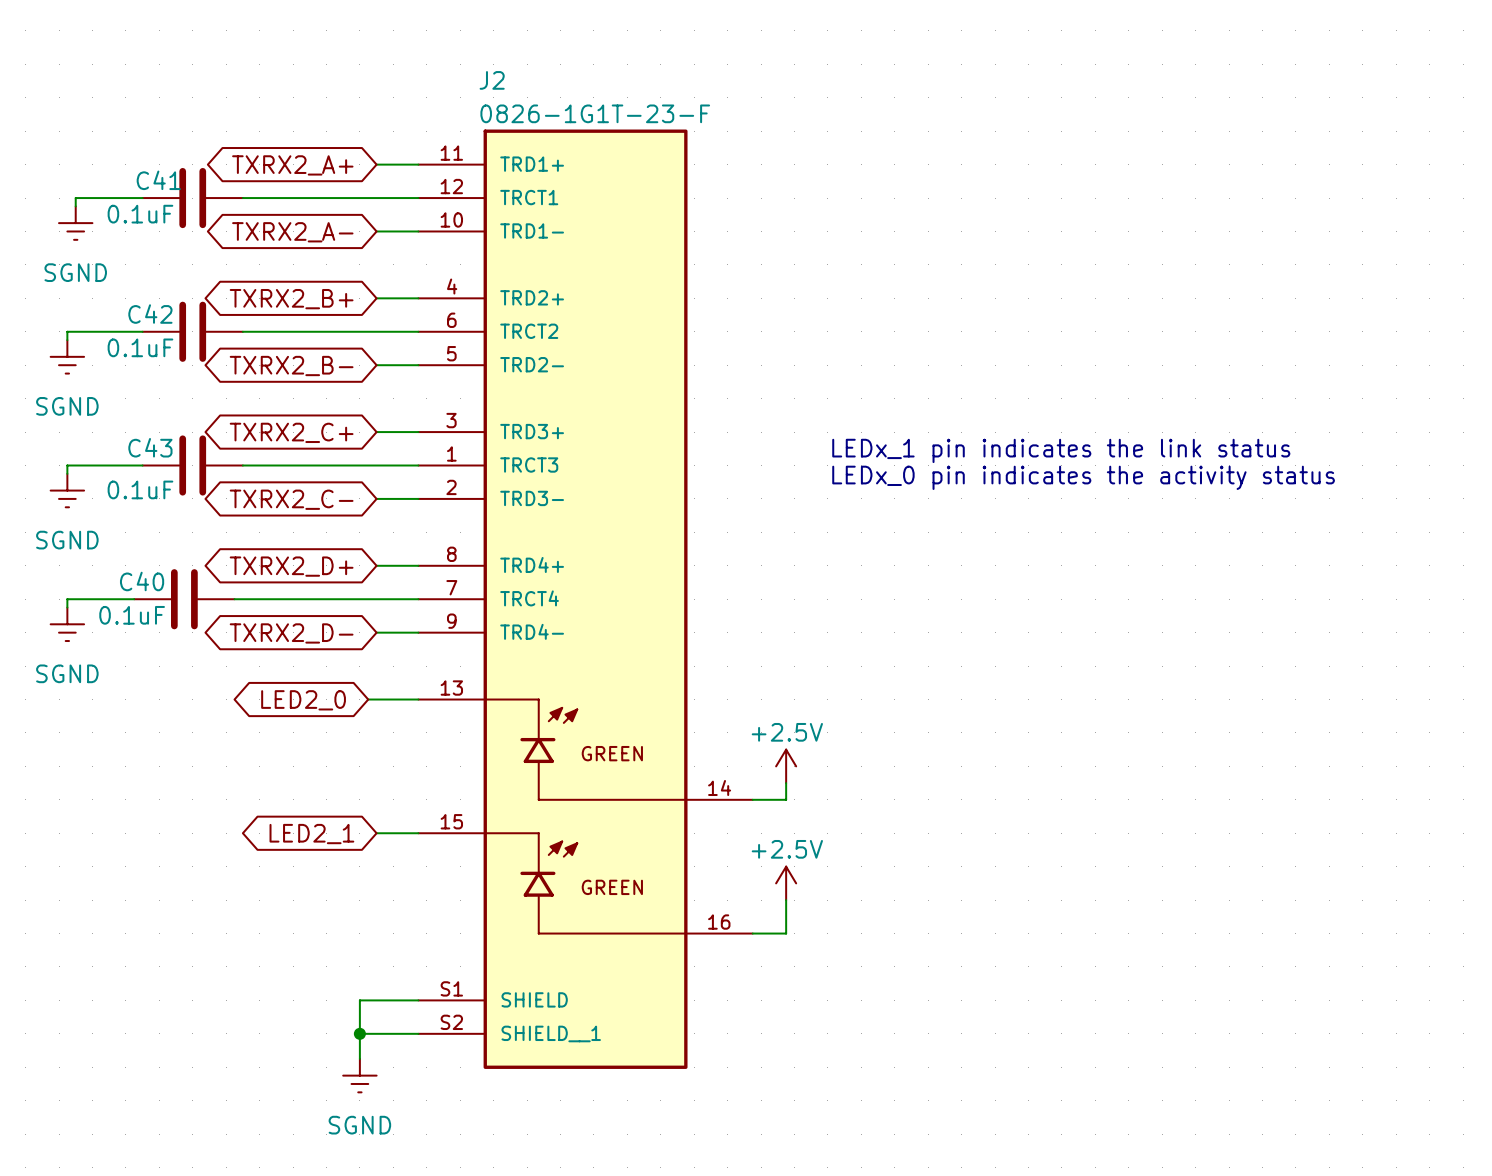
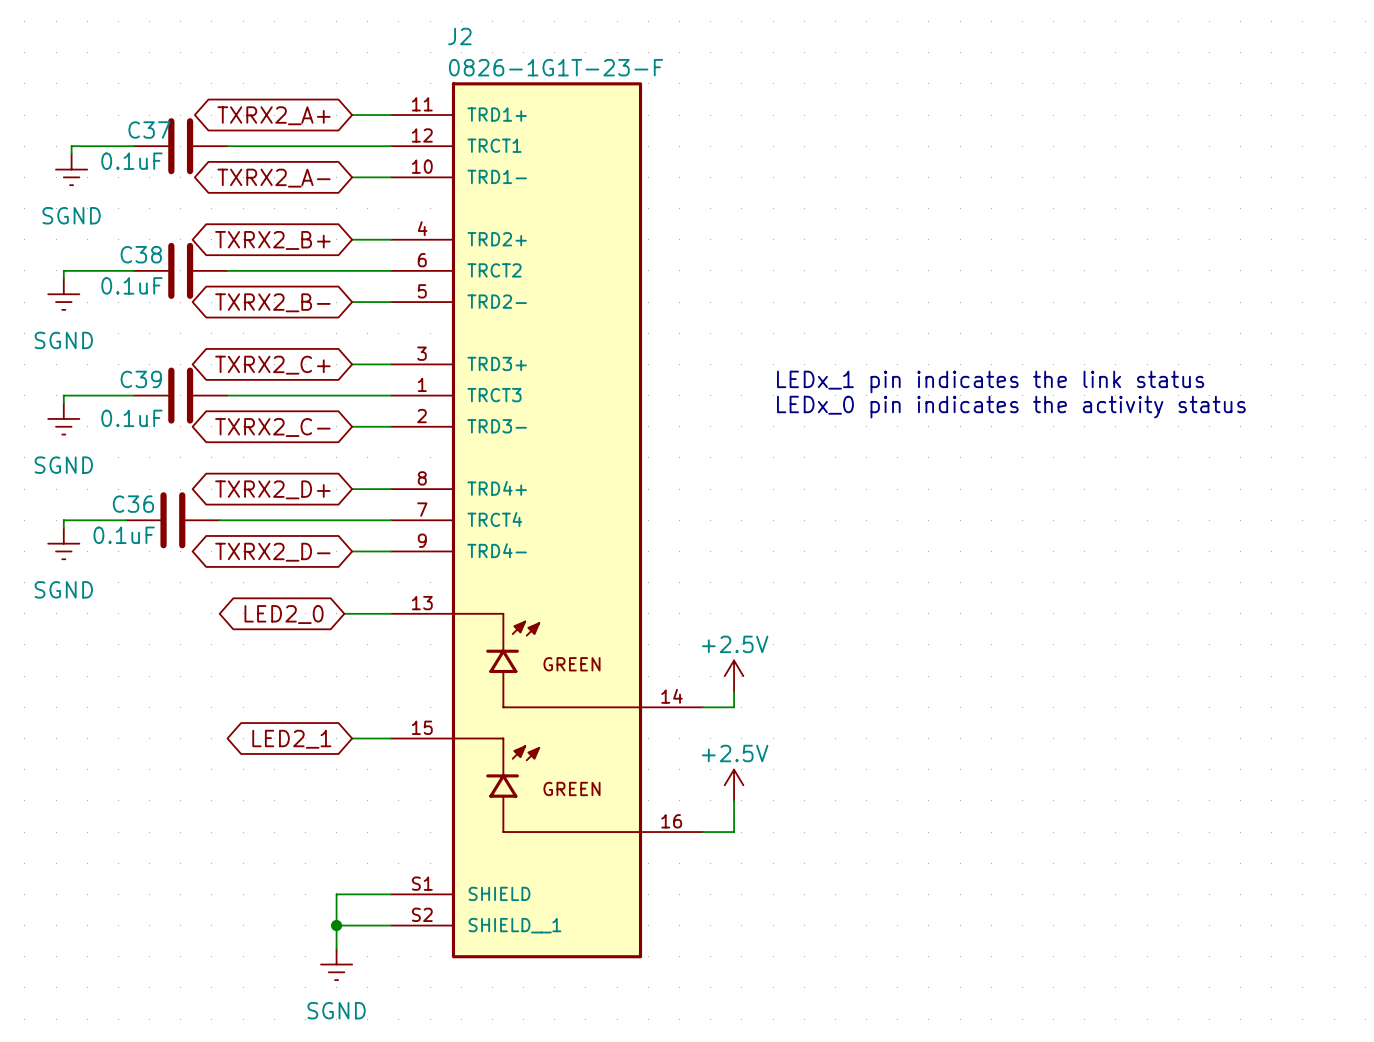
C41 name: C41 (158, 180) -> C37 (149, 130)
C42 name: C42 (150, 314) -> C38 (141, 254)
C43 name: C43 (150, 447) -> C39 (141, 379)
C40 name: C40 (142, 581) -> C36 (133, 504)

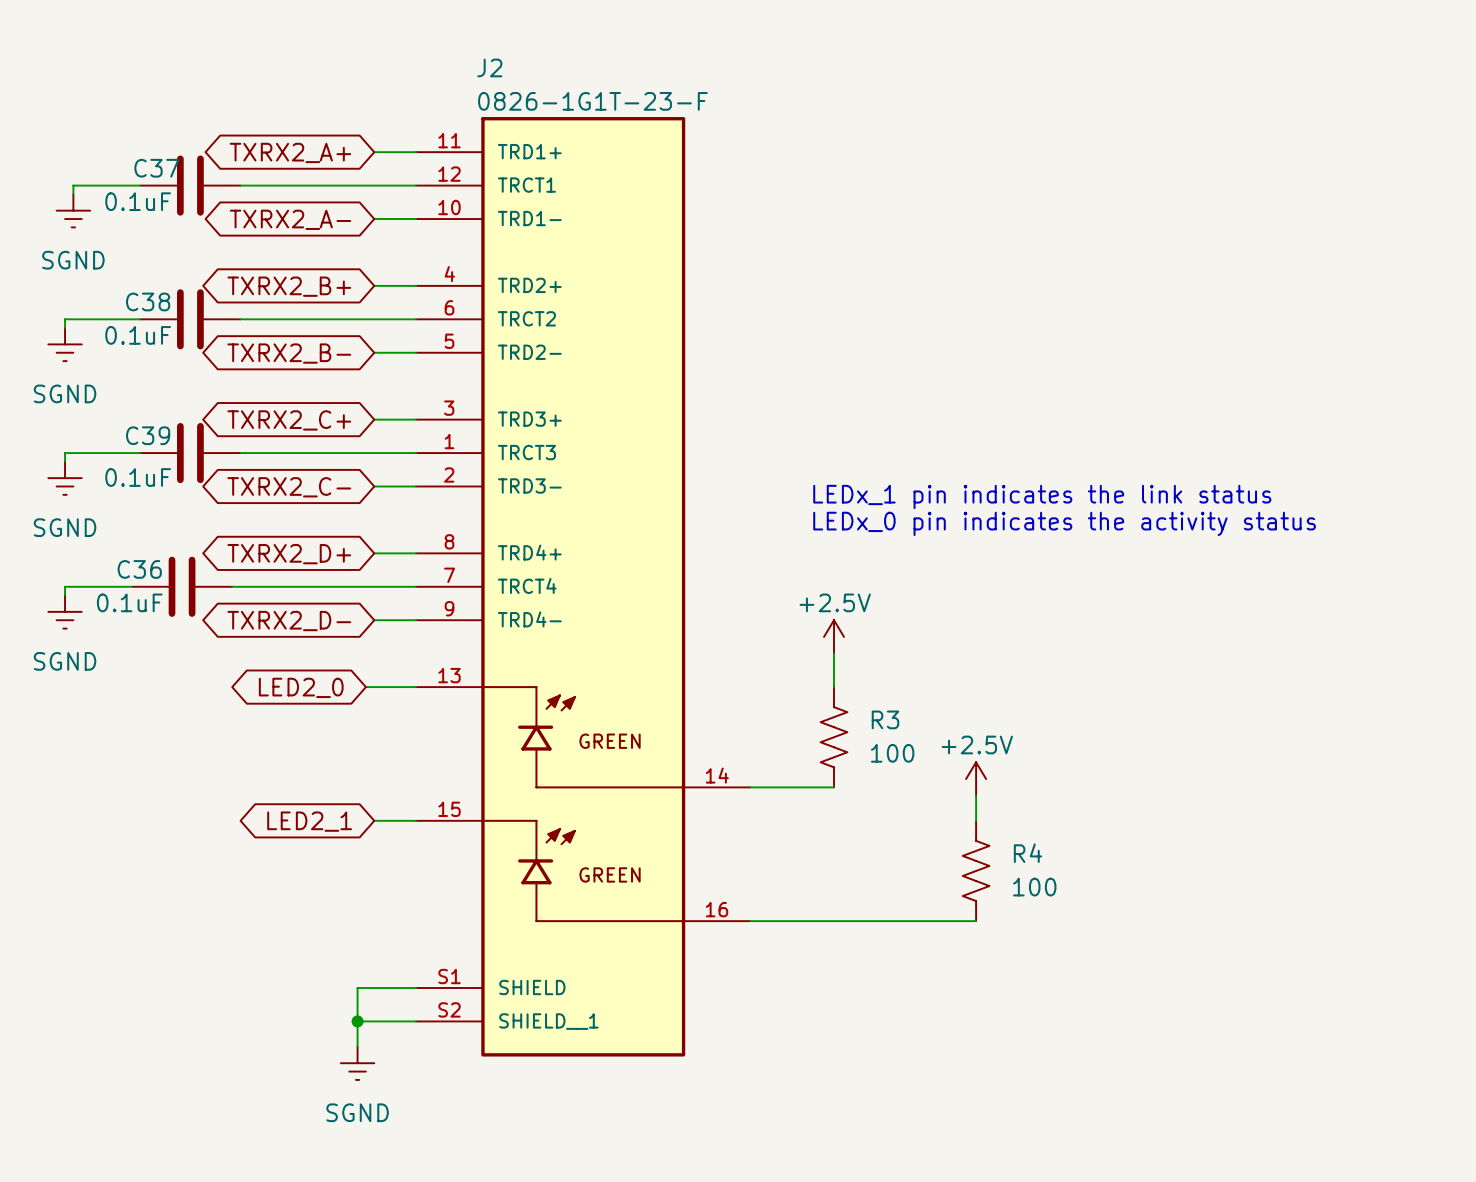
text position: LEDx_1 pin indicates the link status (990, 381) -> LEDx_1 pin indicates the link status (1042, 496)
text position: LEDx_0 pin indicates the activity status (1011, 407) -> LEDx_0 pin indicates the activity status (1064, 523)
power symbol: none -> +2.5V (834, 636)
wire: none -> (834, 653) (834, 687)
R3: none -> 100 (834, 737)
power symbol: +2.5V (734, 676) -> none
wire: (734, 691) (734, 707) -> (834, 787) (783, 787)
power symbol: none -> +2.5V (976, 779)
wire: none -> (976, 795) (976, 820)
power symbol: +2.5V (734, 785) -> none
R4: none -> 100 (976, 870)
wire: (734, 800) (734, 832) -> (976, 921) (783, 921)

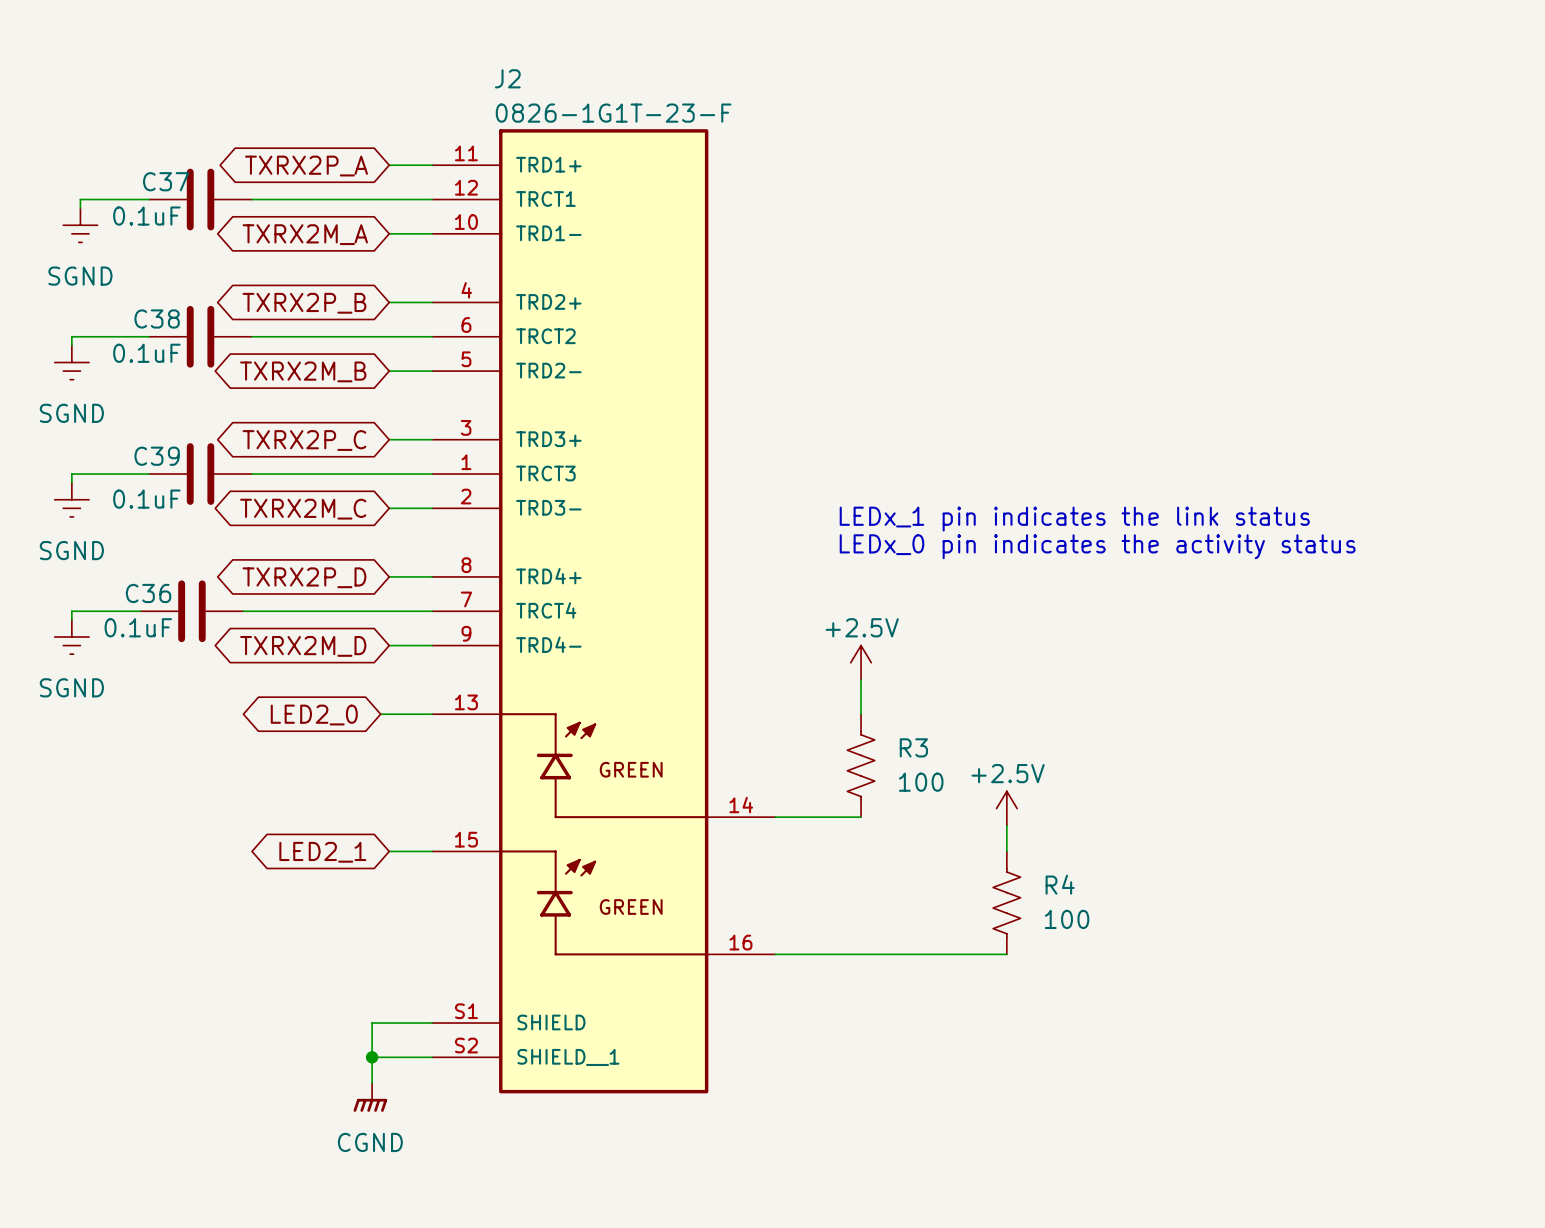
global label: TXRX2_A+ (290, 152) -> TXRX2P_A (306, 166)
global label: TXRX2_A- (290, 219) -> TXRX2M_A (305, 234)
global label: TXRX2_B+ (289, 286) -> TXRX2P_B (304, 303)
global label: TXRX2_B- (289, 353) -> TXRX2M_B (303, 371)
global label: TXRX2_C+ (289, 420) -> TXRX2P_C (304, 440)
global label: TXRX2_C- (289, 487) -> TXRX2M_C (303, 509)
global label: TXRX2_D+ (289, 554) -> TXRX2P_D (304, 577)
global label: TXRX2_D- (289, 621) -> TXRX2M_D (303, 646)
power symbol: SGND (357, 1063) -> CGND (370, 1097)

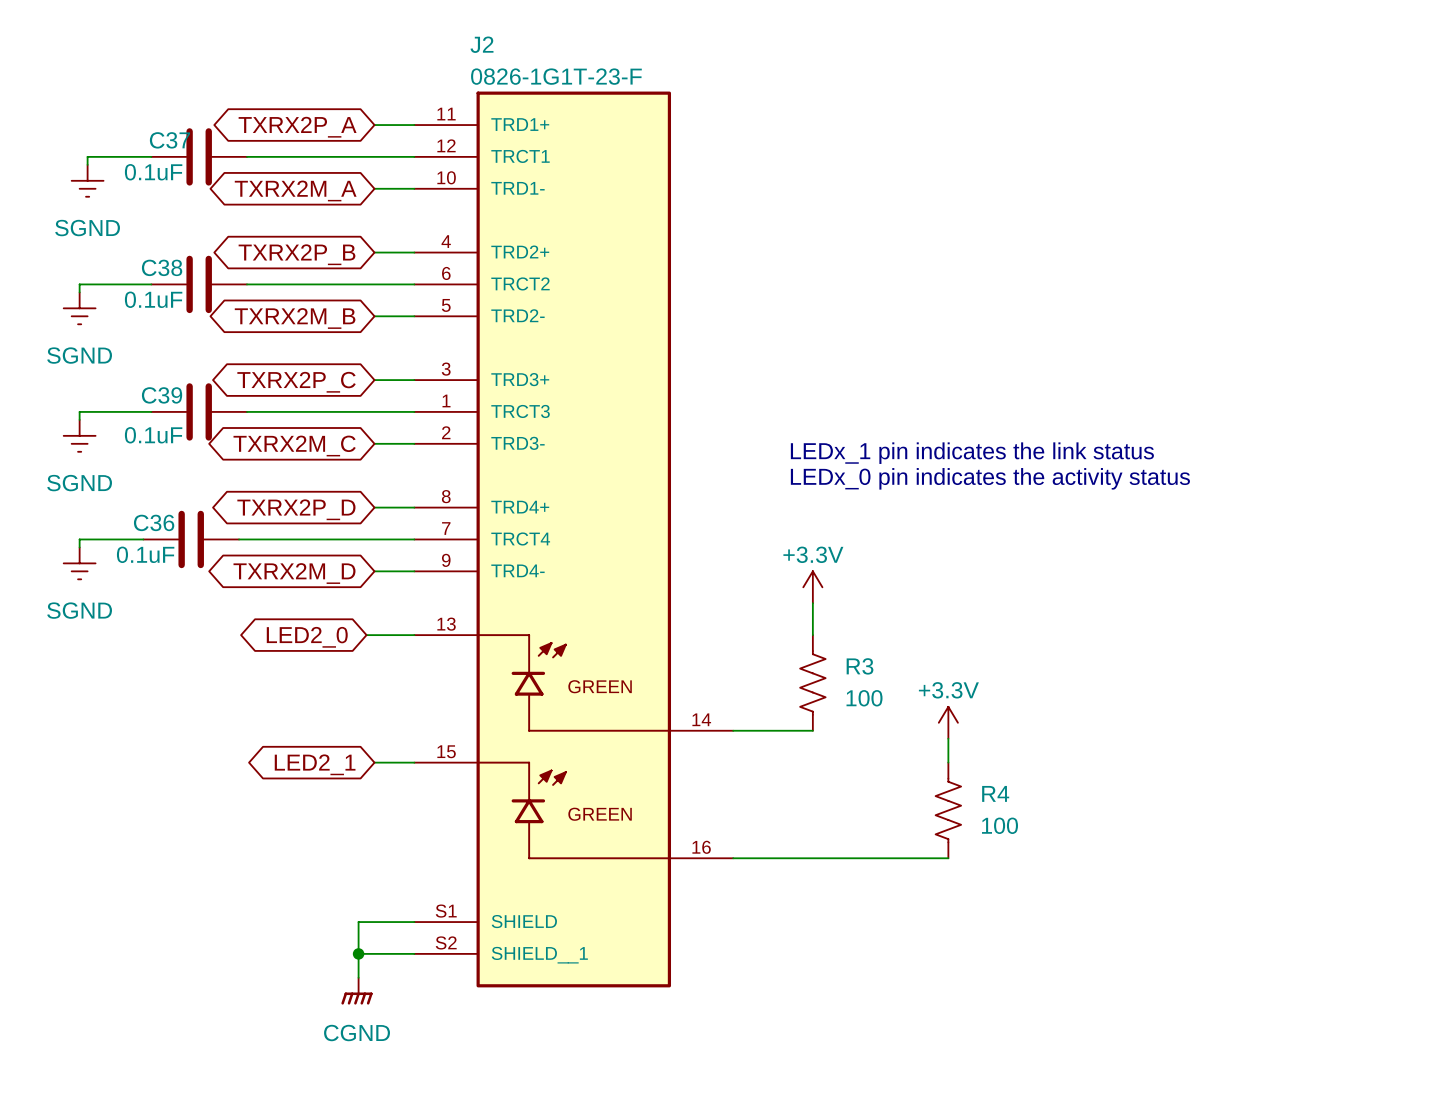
power symbol: +2.5V (861, 662) -> +3.3V (812, 587)
power symbol: +2.5V (1006, 808) -> +3.3V (948, 722)

